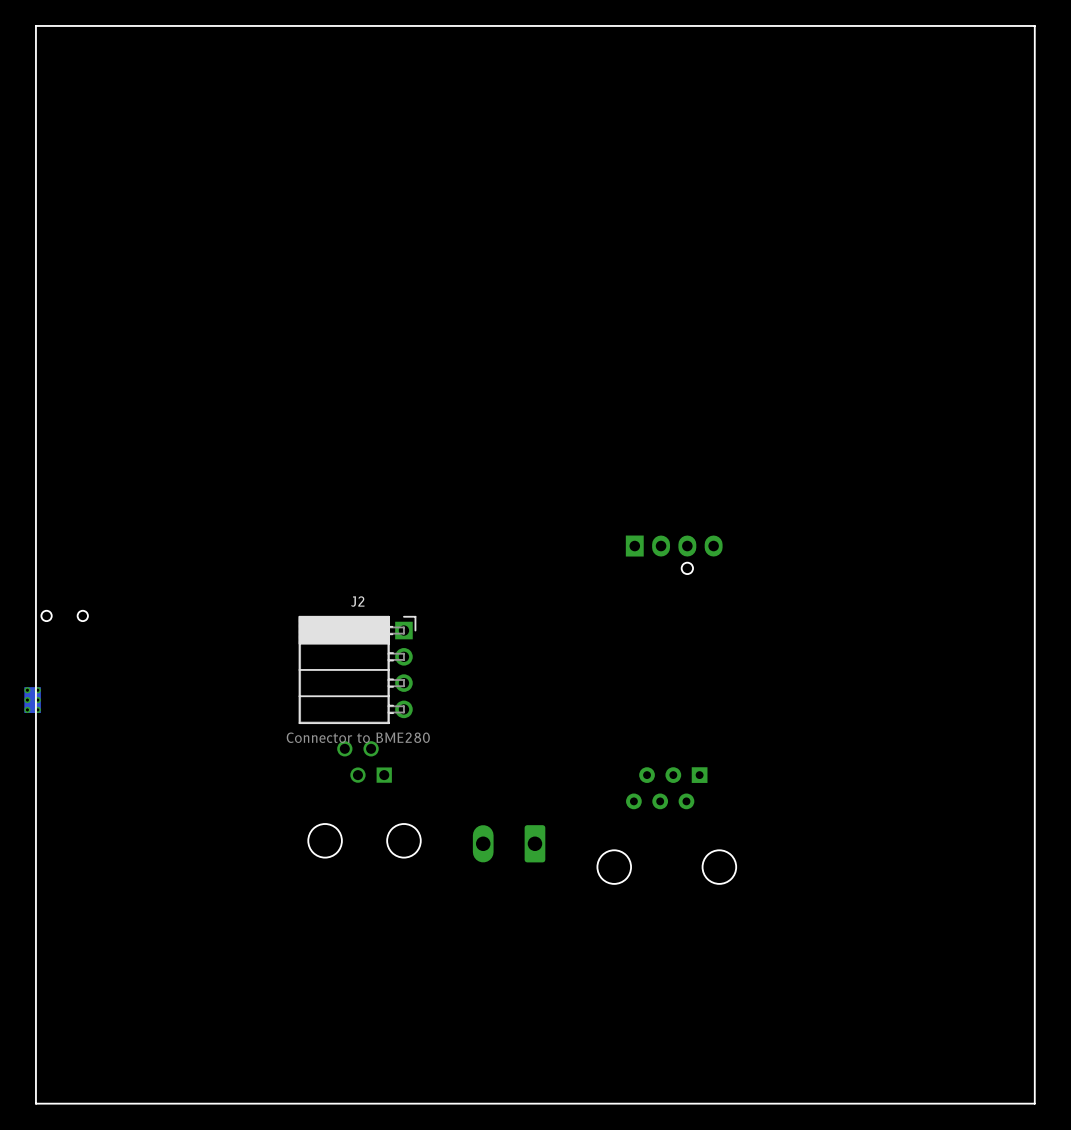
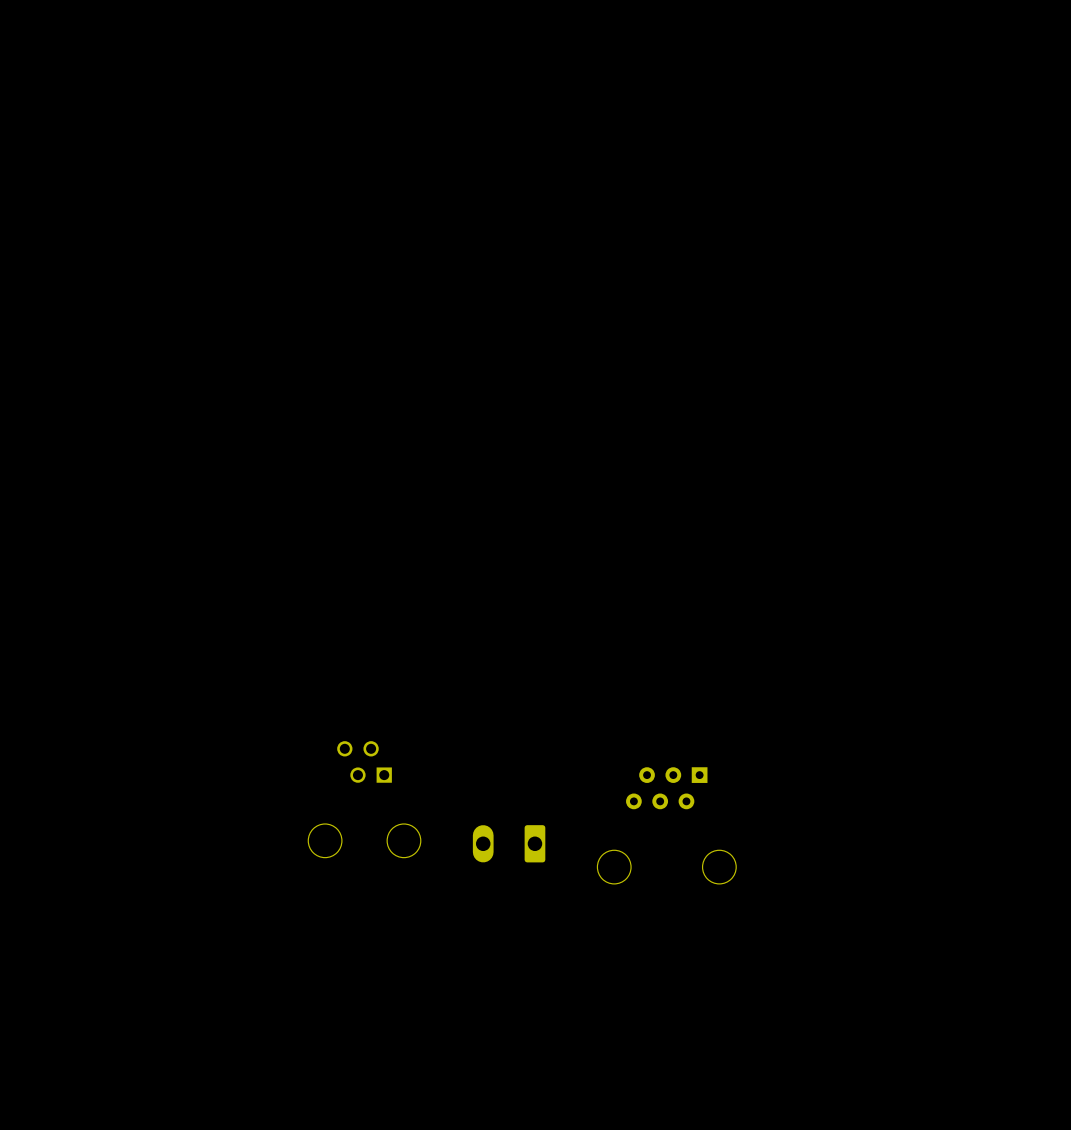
board edge: (1034, 25) (35, 25) (35, 1103) (1034, 1103) (1034, 25) -> none
part: (674, 554) -> none
part: (64, 615) -> none
J2: Connector to BME280 (357, 669) -> none
part: (32, 700) -> none

